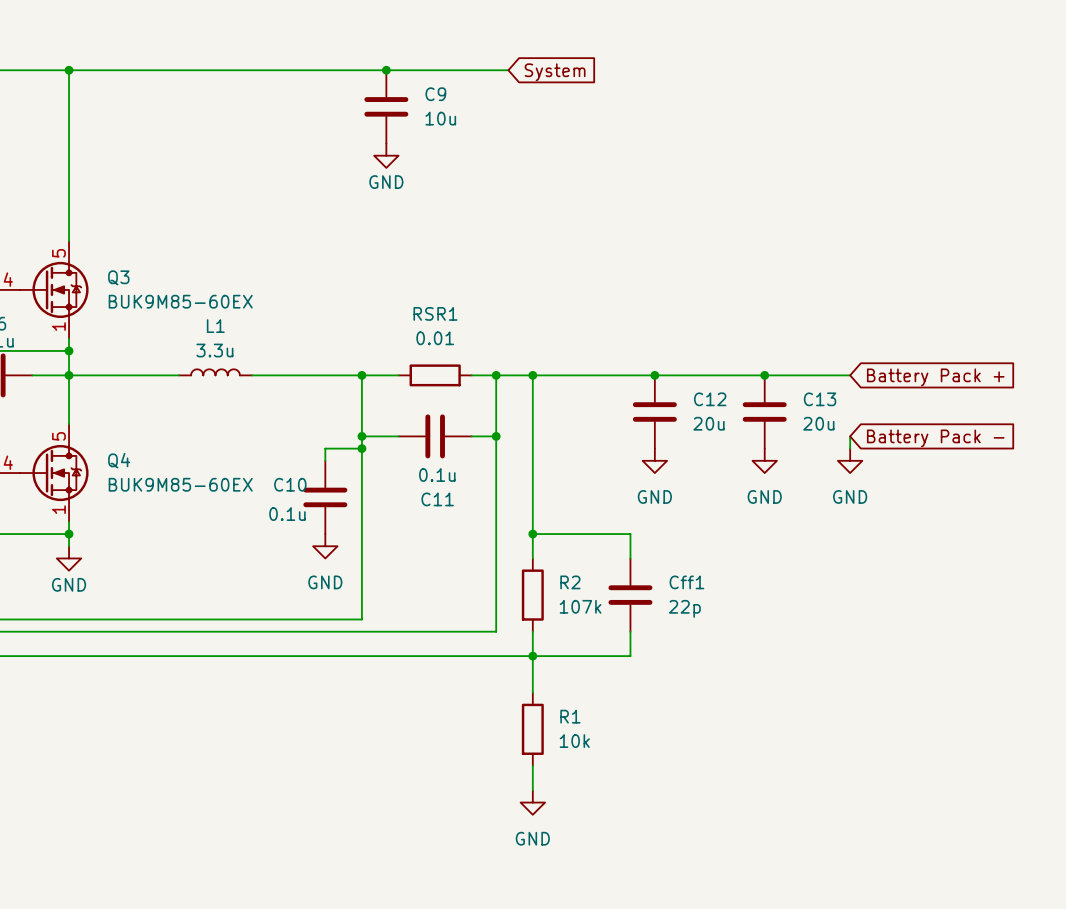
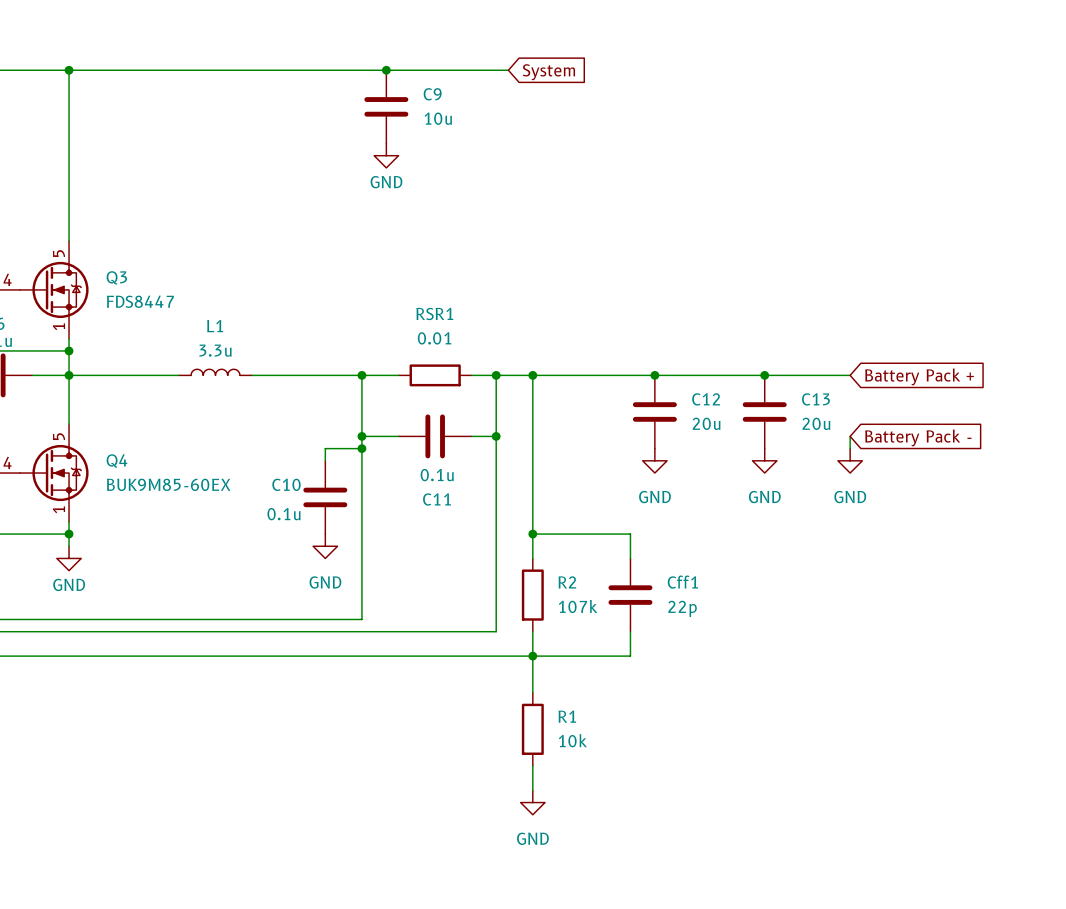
Q3 value: BUK9M85-60EX (180, 301) -> FDS8447 (140, 301)

